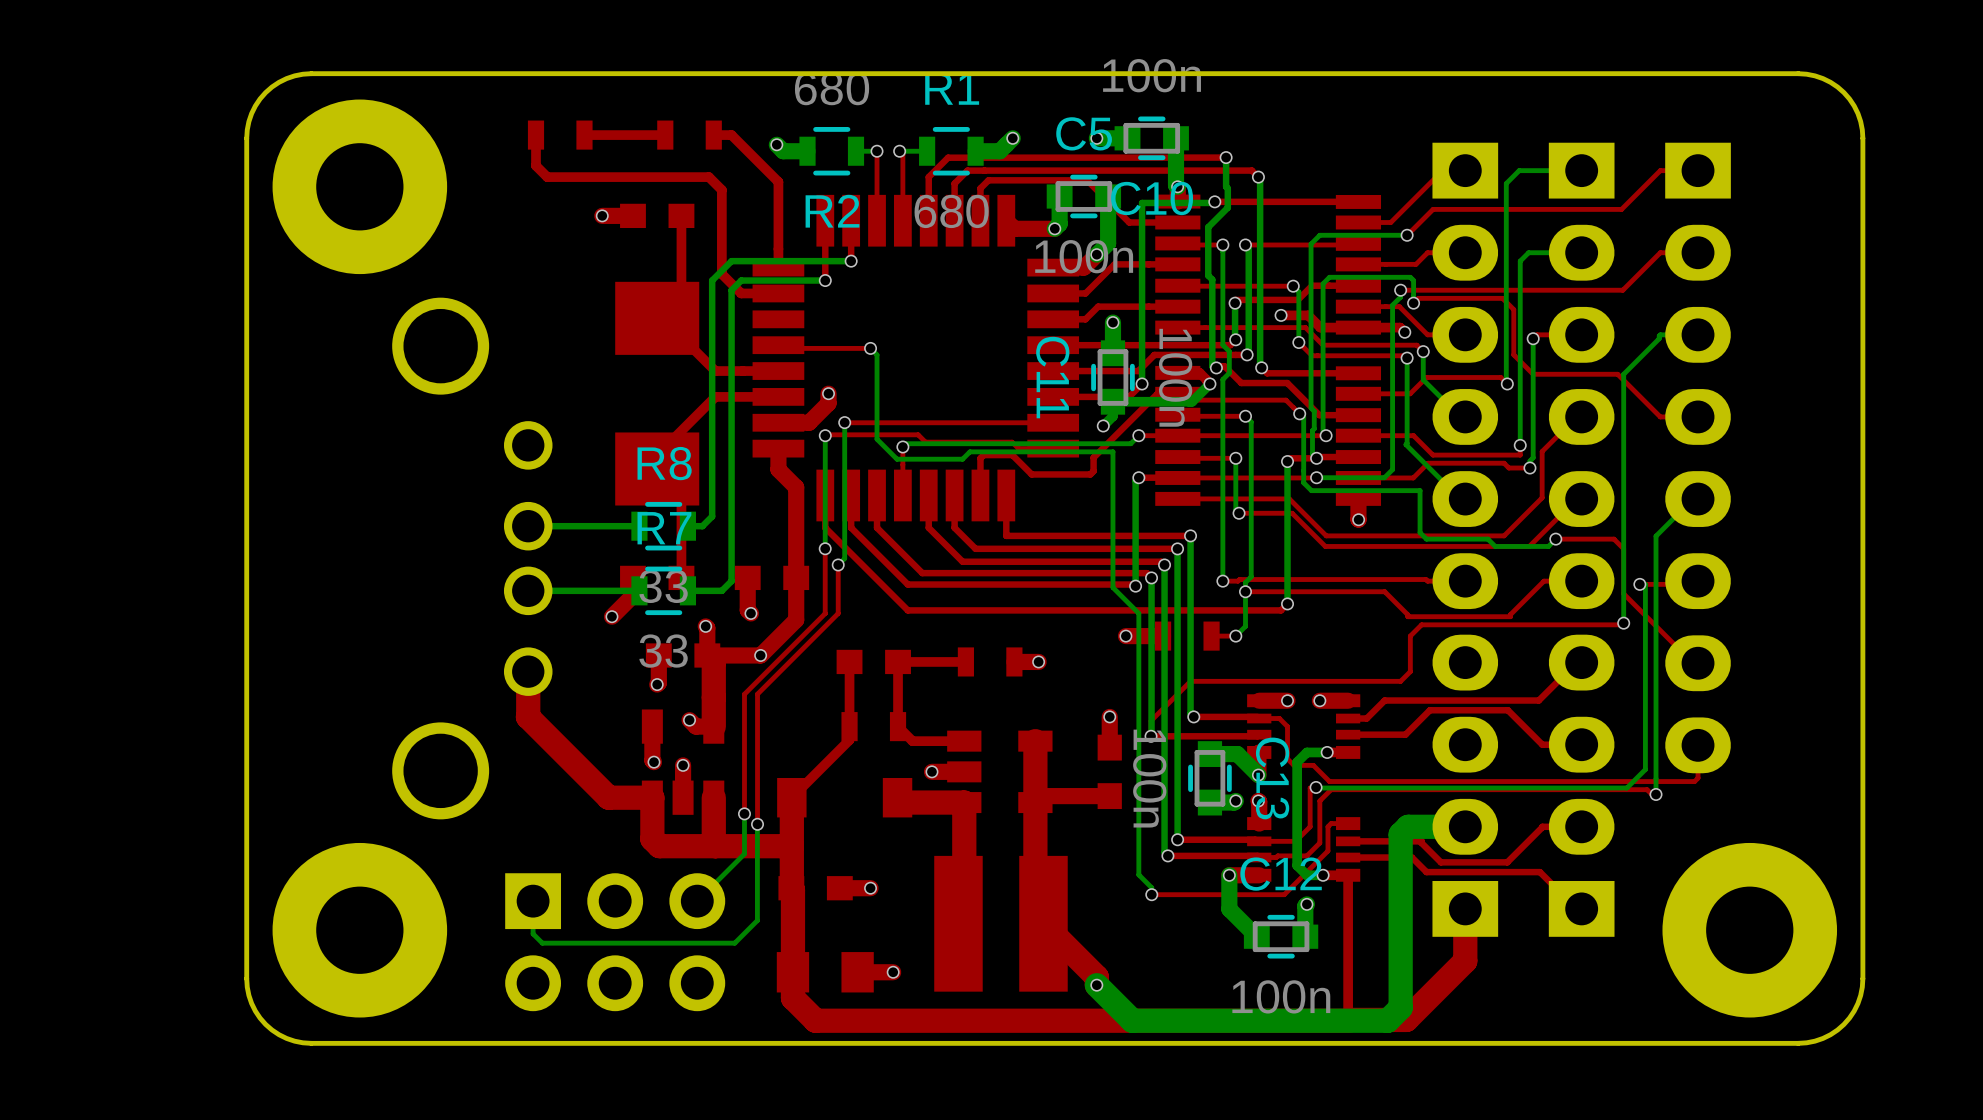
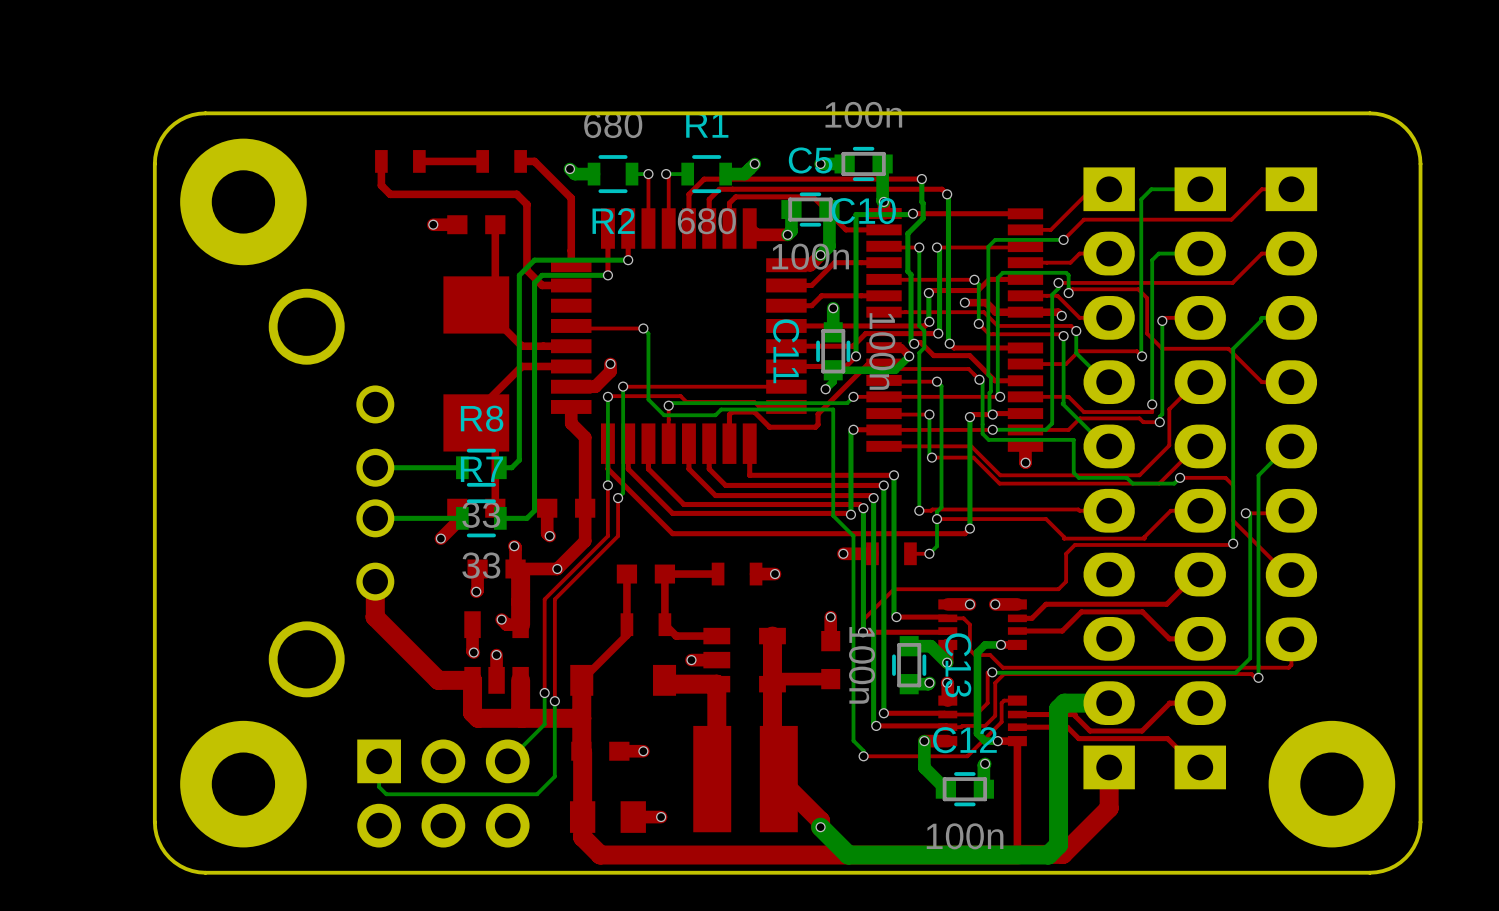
part footprint: [272, 99, 448, 275] -> [180, 138, 307, 266]
part footprint: [272, 842, 448, 1018] -> [180, 720, 307, 848]
part footprint: [1662, 842, 1838, 1018] -> [1268, 720, 1396, 848]

